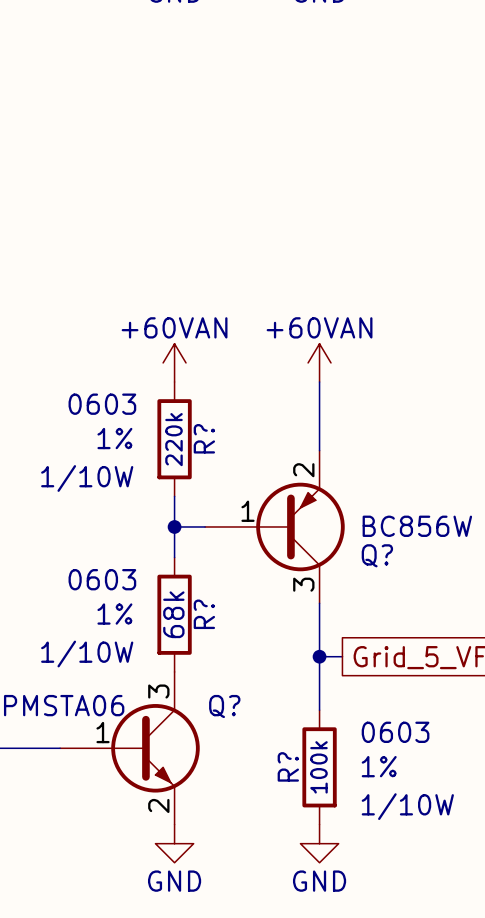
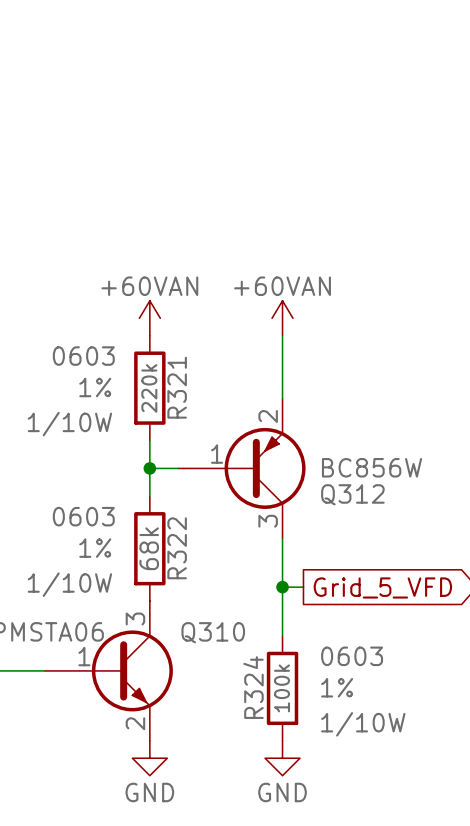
R? name: R? (204, 438) -> R321 (177, 387)
Q? name: Q? (377, 555) -> Q312 (352, 494)
R? name: R? (204, 614) -> R322 (177, 548)
Q? name: Q? (224, 706) -> Q310 (213, 632)
R? name: R? (288, 766) -> R324 (253, 687)

